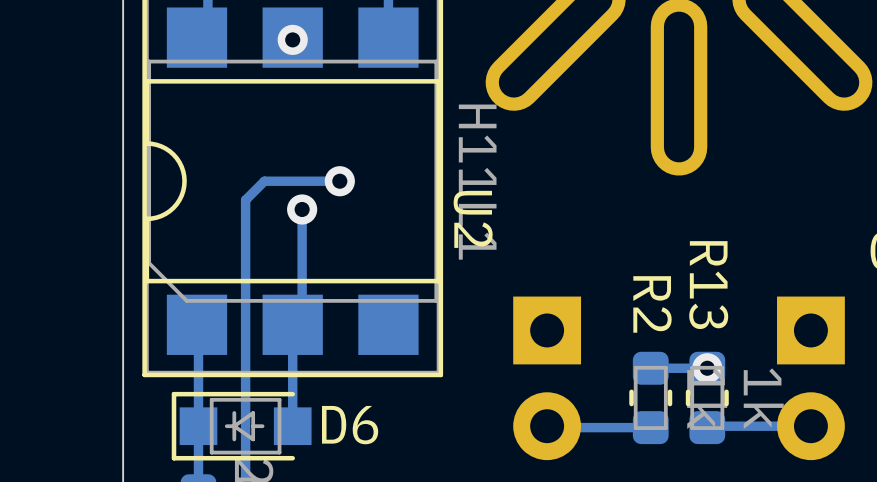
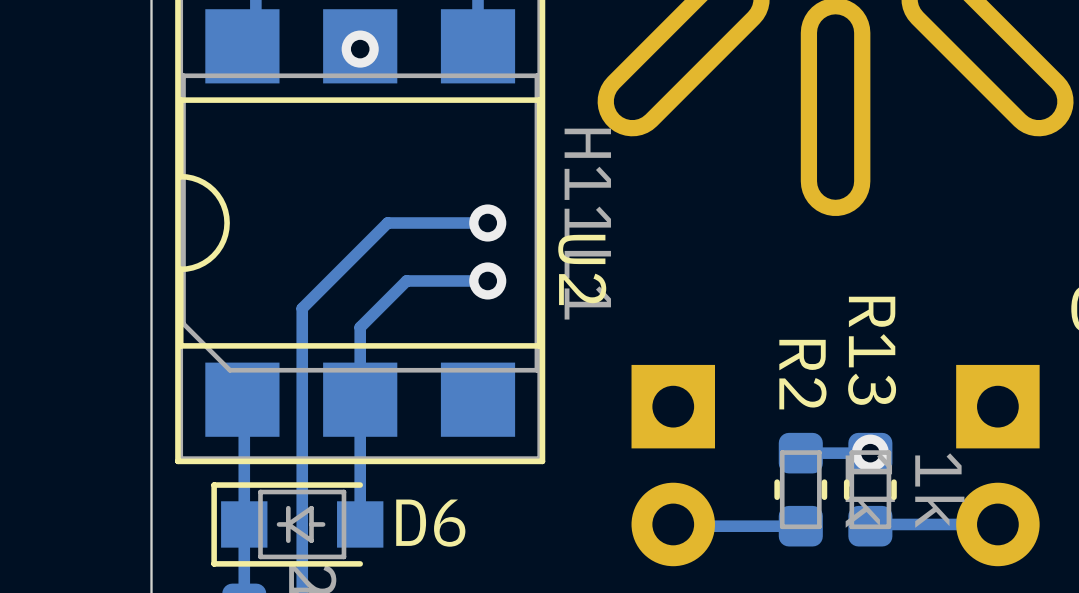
track: (315, 181) (264, 181) (245, 200) (245, 250) -> (387, 223) (302, 308)
via: (339, 181) -> none
track: none -> (487, 223) (418, 223)
via: none -> (487, 223)
track: (302, 209) (302, 315) (292, 324) -> (487, 280) (406, 280) (360, 327) (360, 399)
via: (302, 209) -> none
via: none -> (487, 280)

